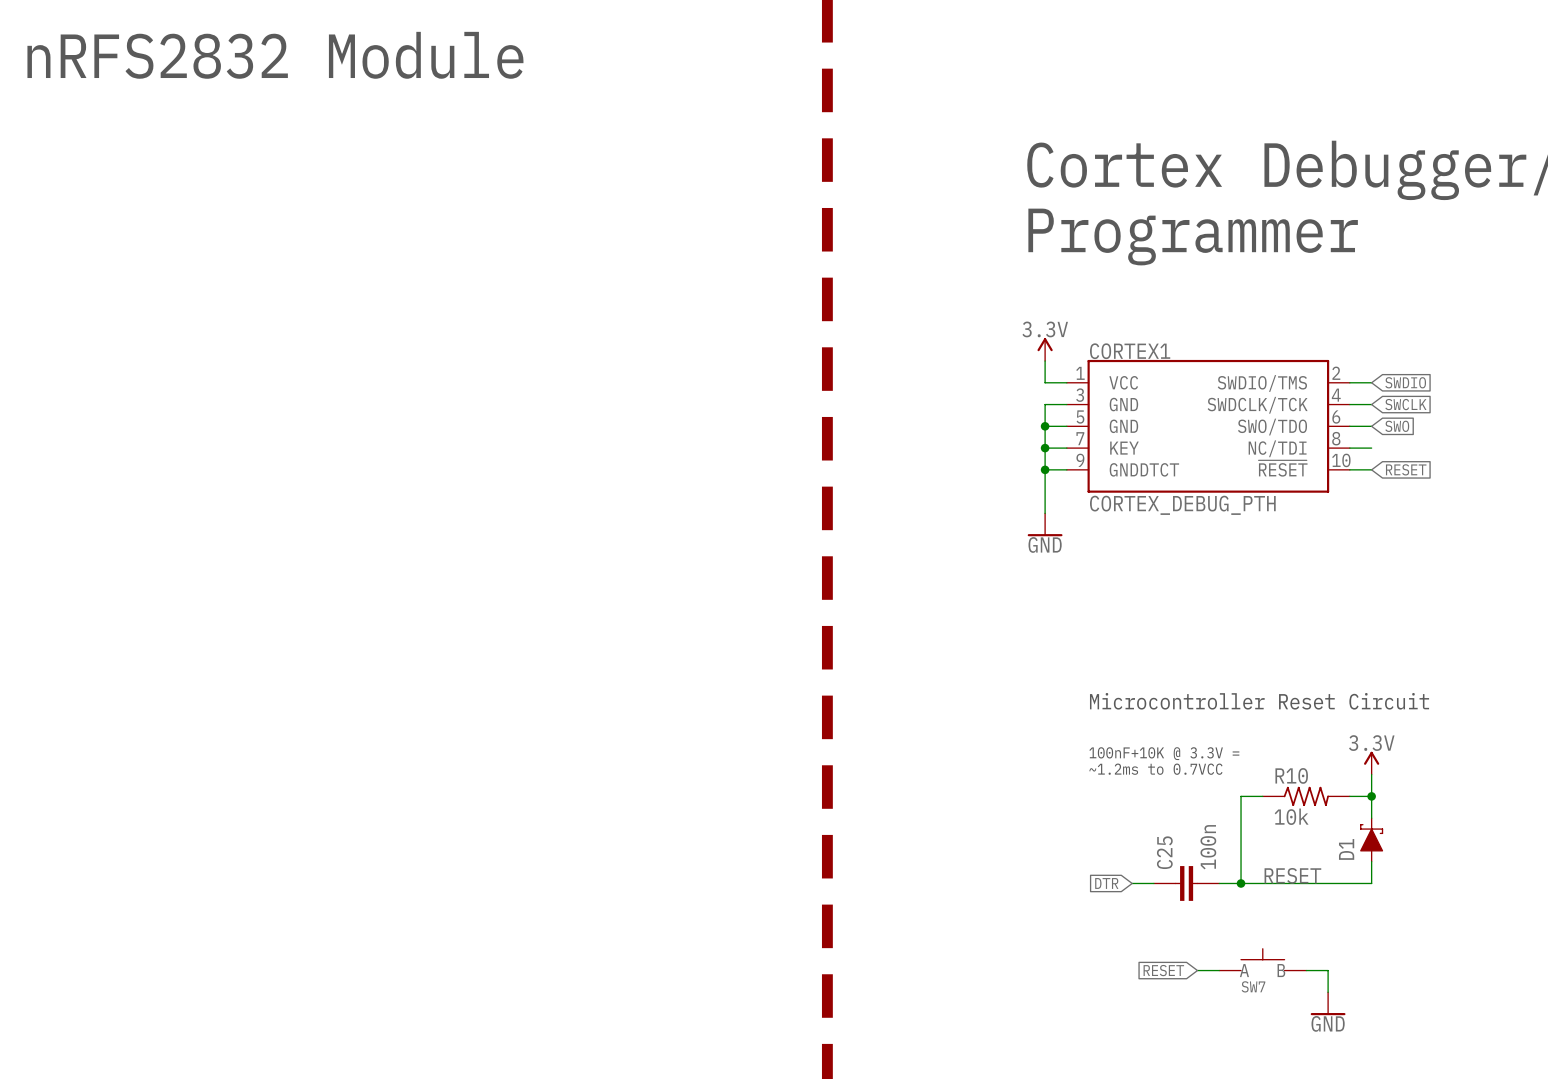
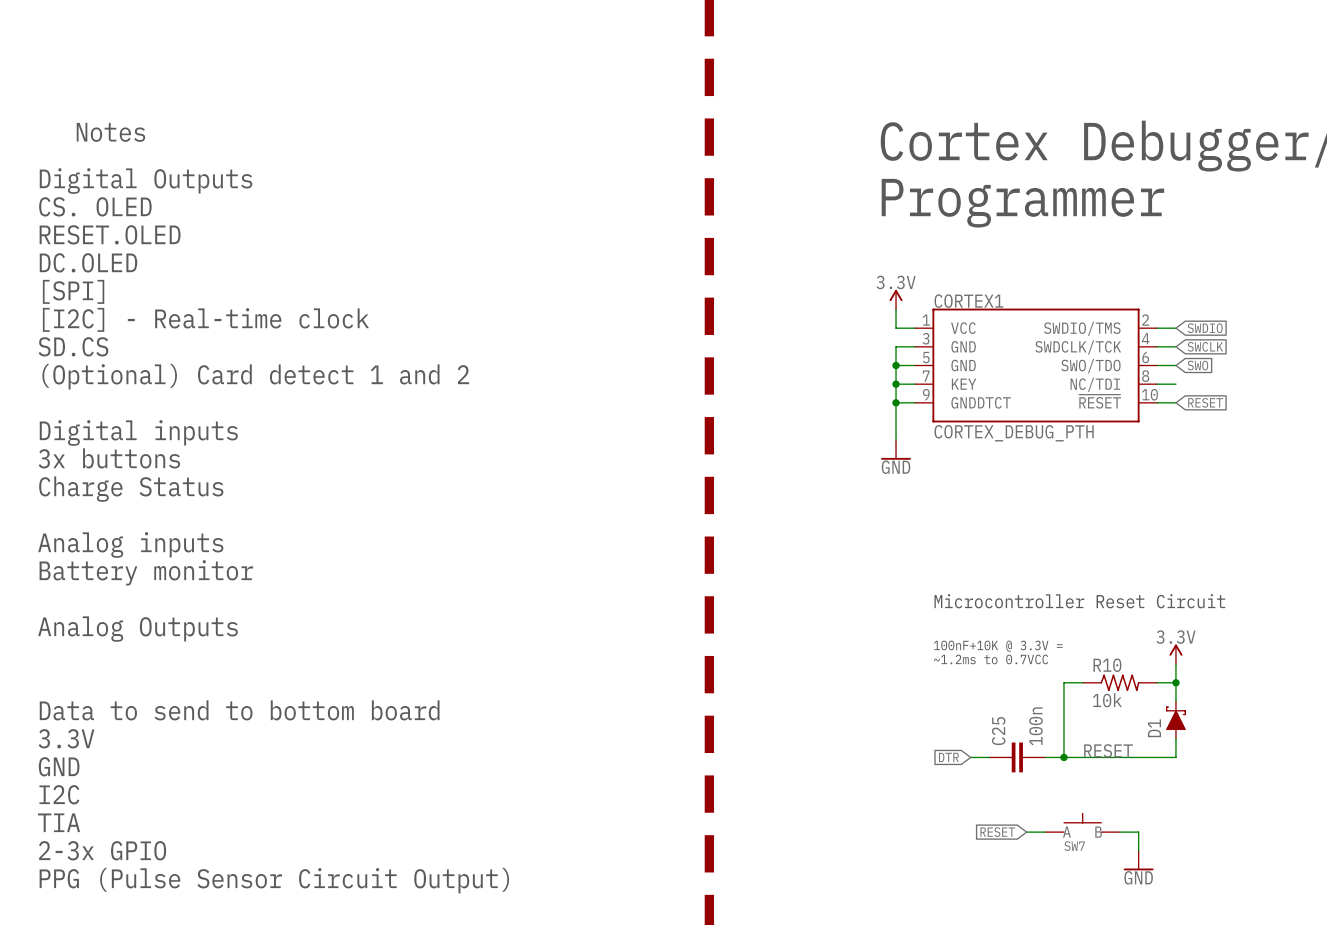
text: nRFS2832 Module (275, 55) -> none
text: none -> Notes (110, 132)
text: none -> Digital Outputs (146, 181)
text: none -> CS. OLED (95, 206)
text: none -> RESET.OLED (110, 234)
text: none -> DC.OLED (88, 262)
text: none -> [SPI] (73, 291)
text: none -> [I2C] - Real-time clock (205, 319)
text: none -> SD.CS (73, 346)
text: none -> (Optional) Card detect 1 and 2 (255, 376)
text: none -> Digital inputs (138, 433)
text: none -> 3x buttons (109, 458)
text: none -> Charge Status (131, 489)
text: none -> Analog inputs (130, 544)
text: none -> Battery monitor (146, 572)
text: none -> Analog Outputs (138, 629)
text: none -> Data to send to bottom board (239, 710)
text: none -> 3.3V (66, 738)
text: none -> GND (59, 766)
text: none -> I2C (59, 794)
text: none -> TIA (59, 822)
text: none -> 2-3x GPIO (102, 850)
text: none -> PPG (Pulse Sensor Circuit Output) (274, 880)

